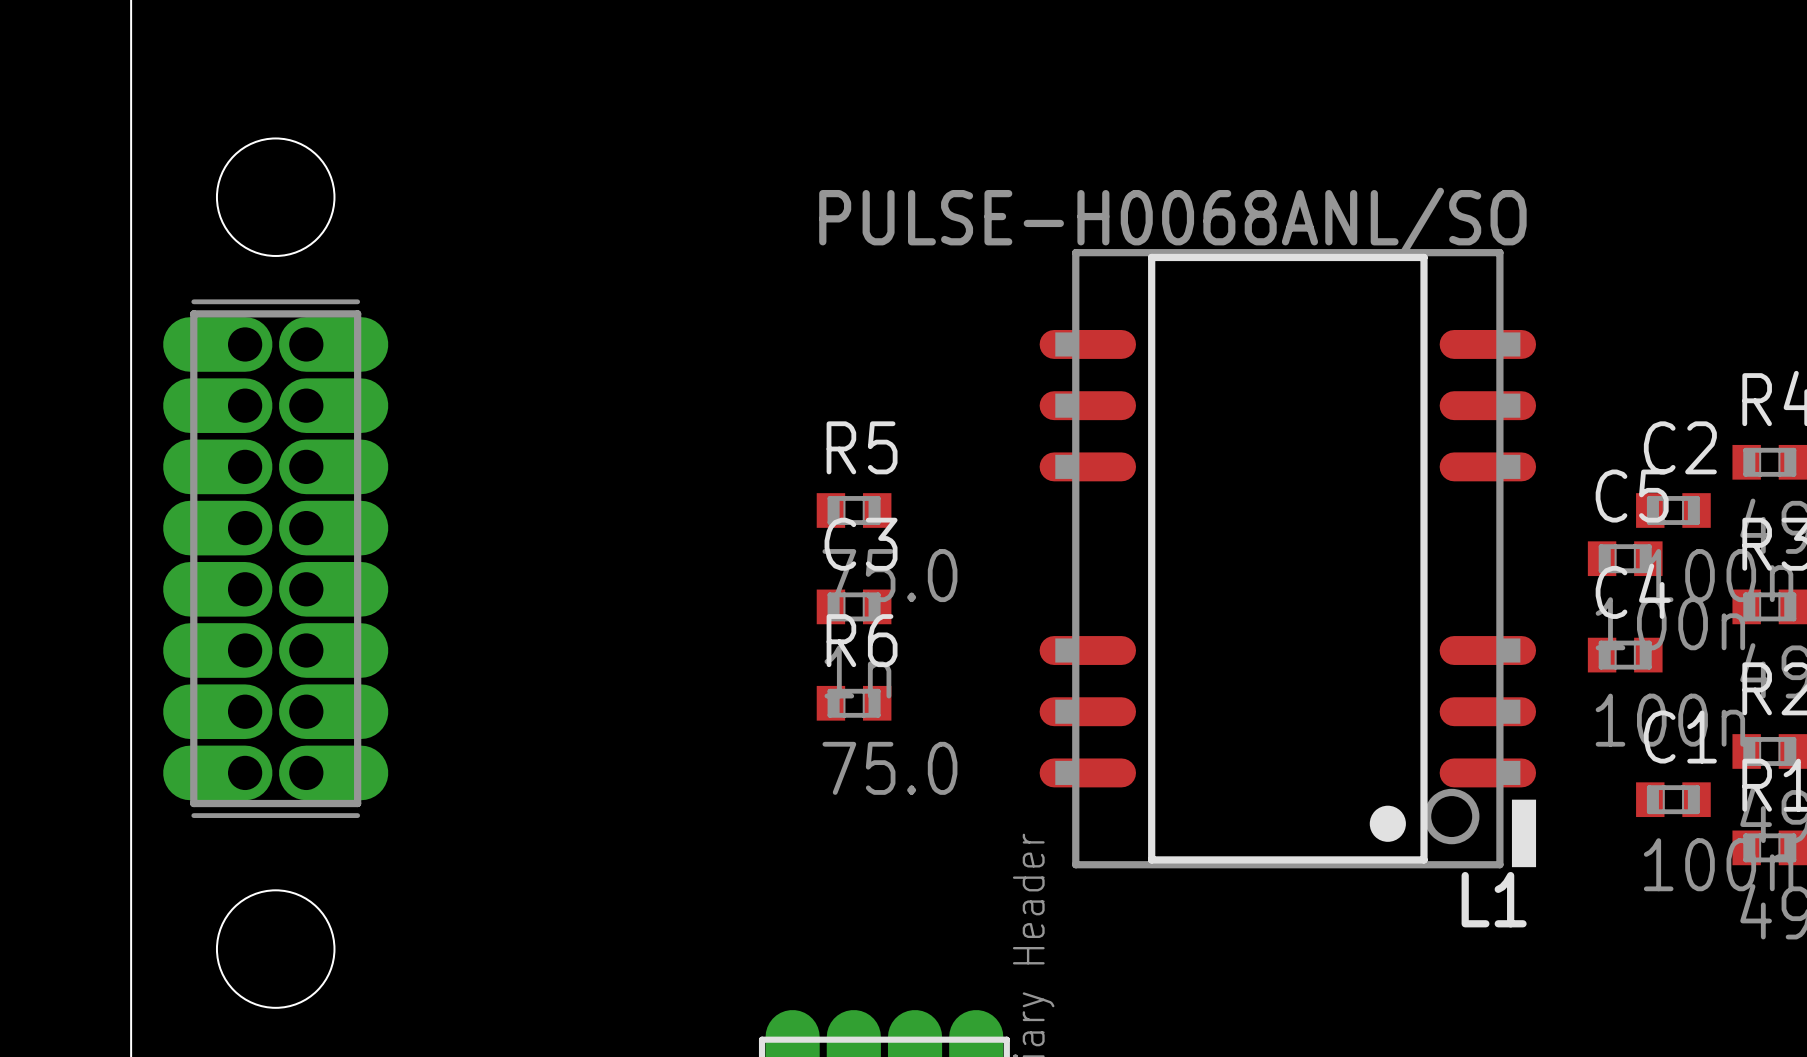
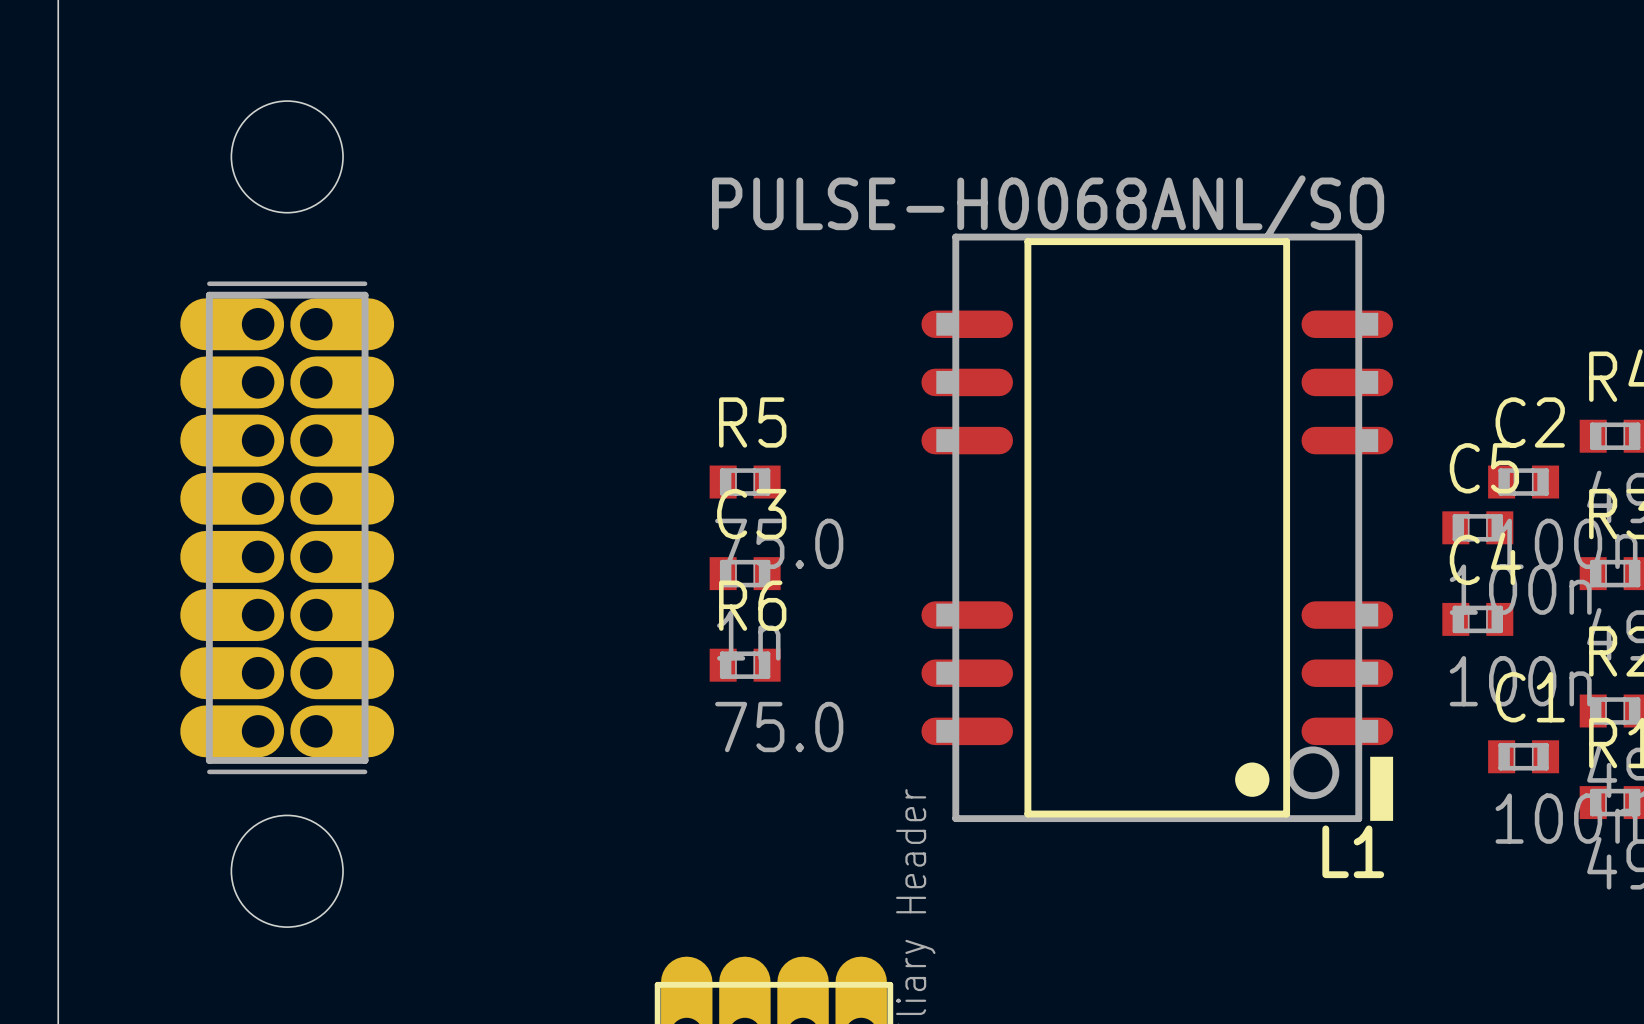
part rotation: 0° (275, 573) -> 180° (287, 514)

